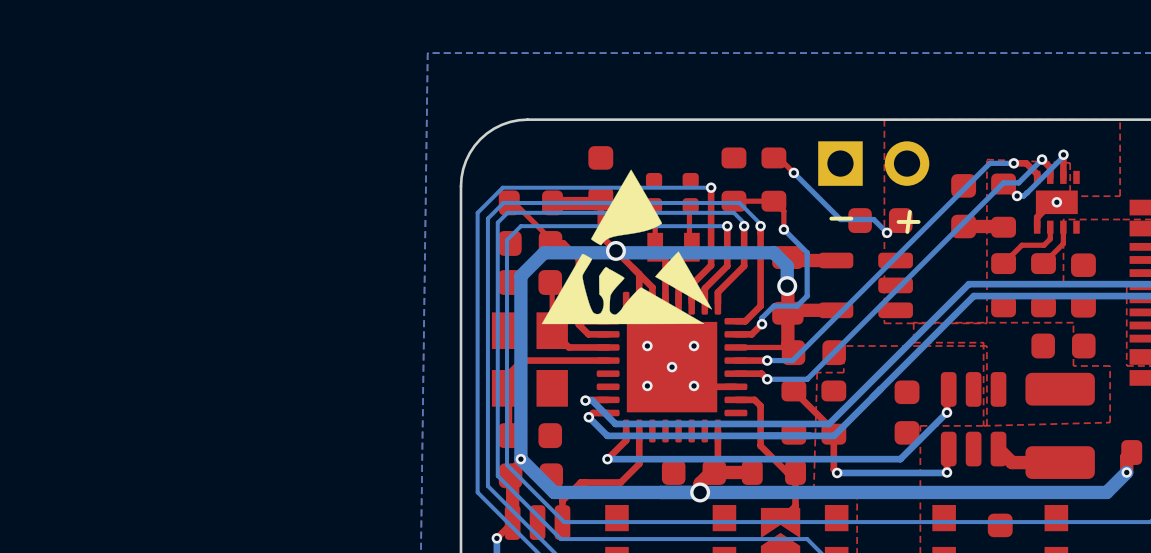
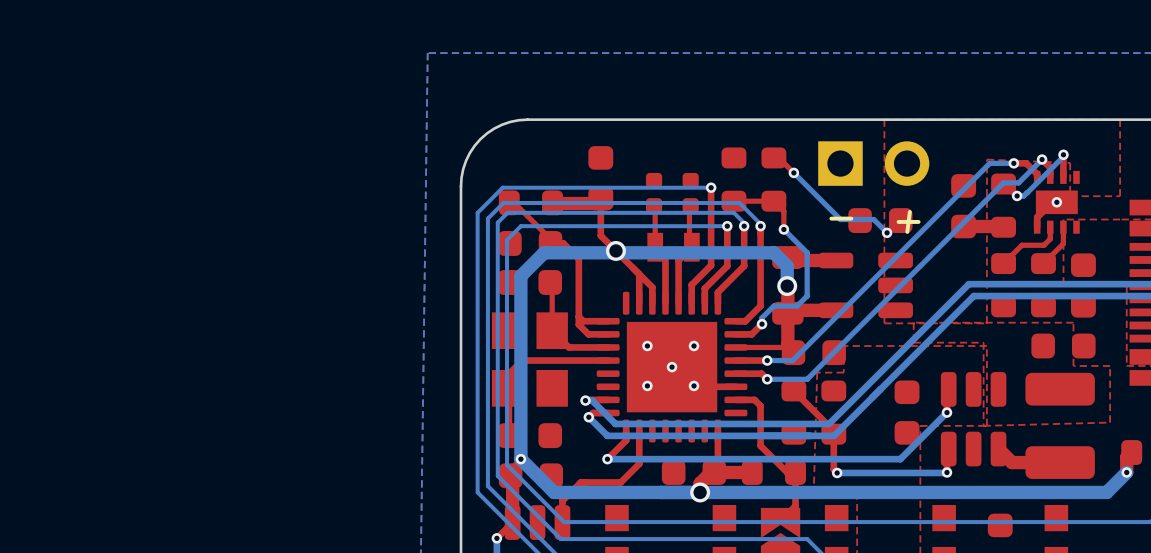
drawing: [541, 169, 712, 325] -> none

